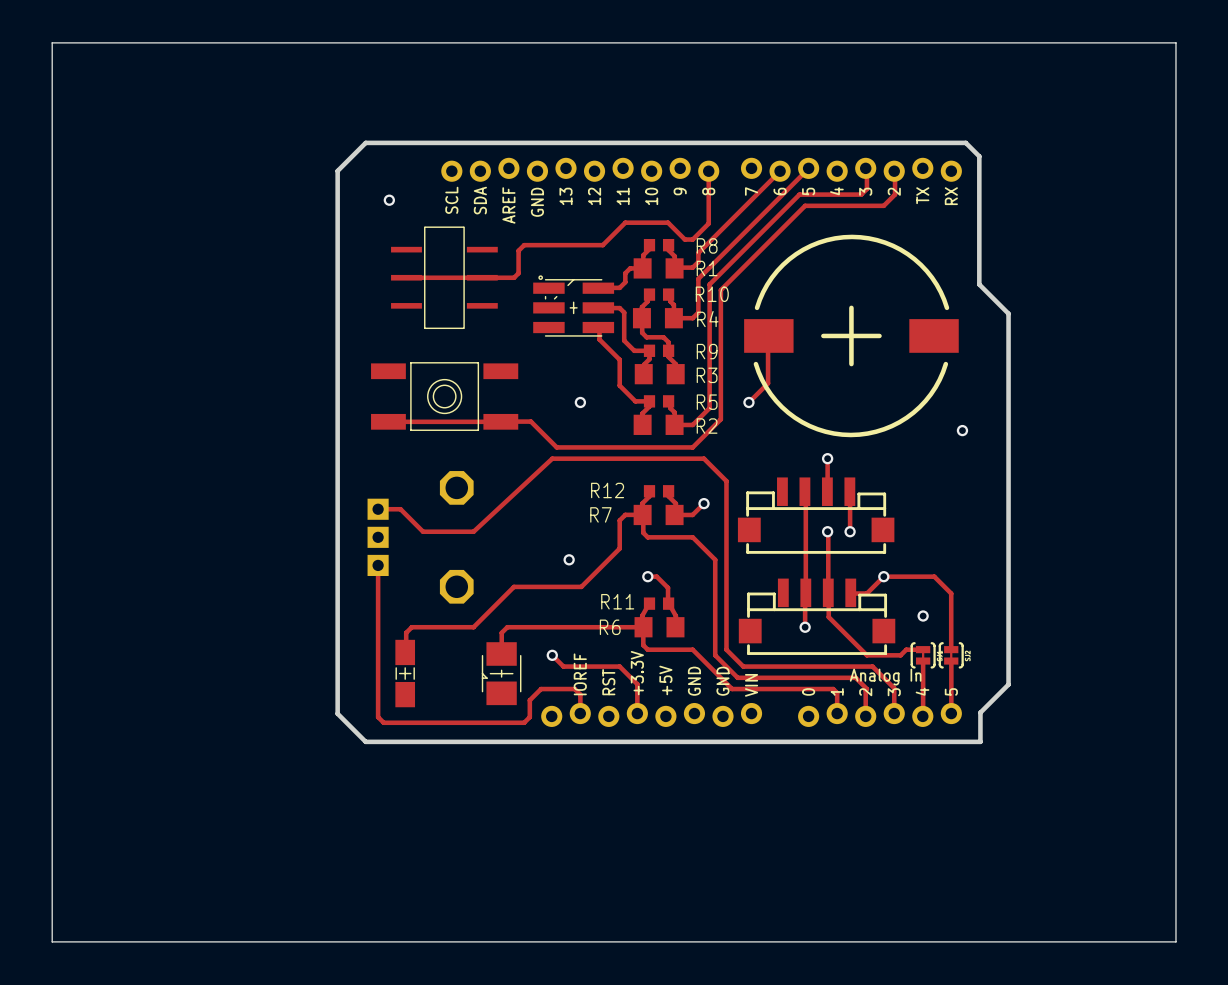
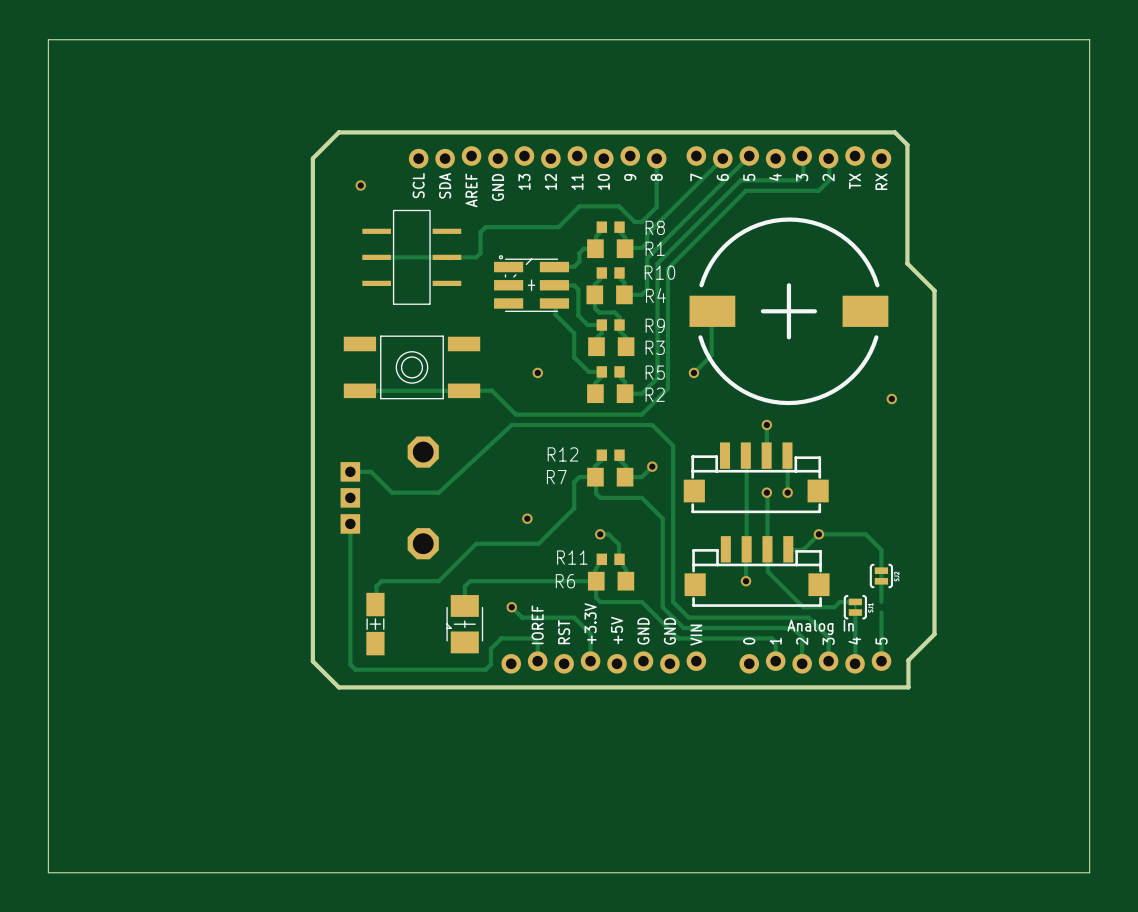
via: (923, 616) -> none
part position: (951, 655) -> (881, 575)

